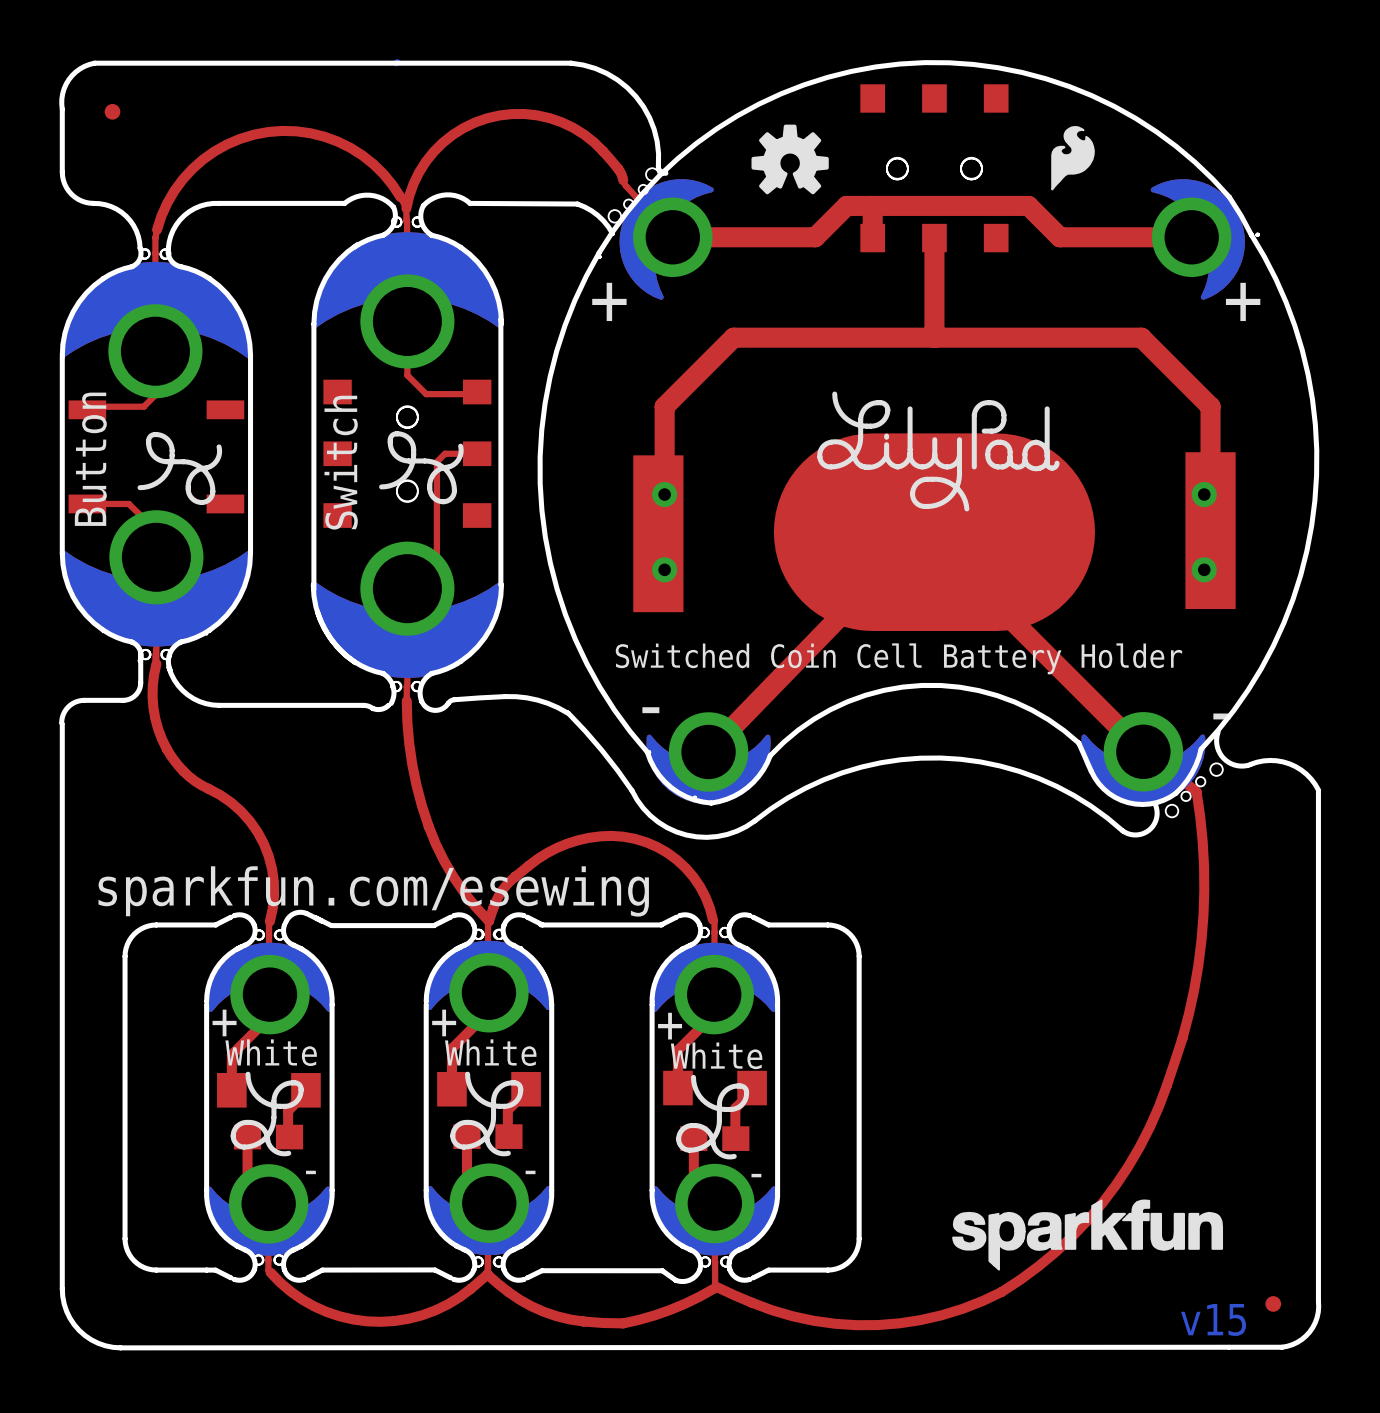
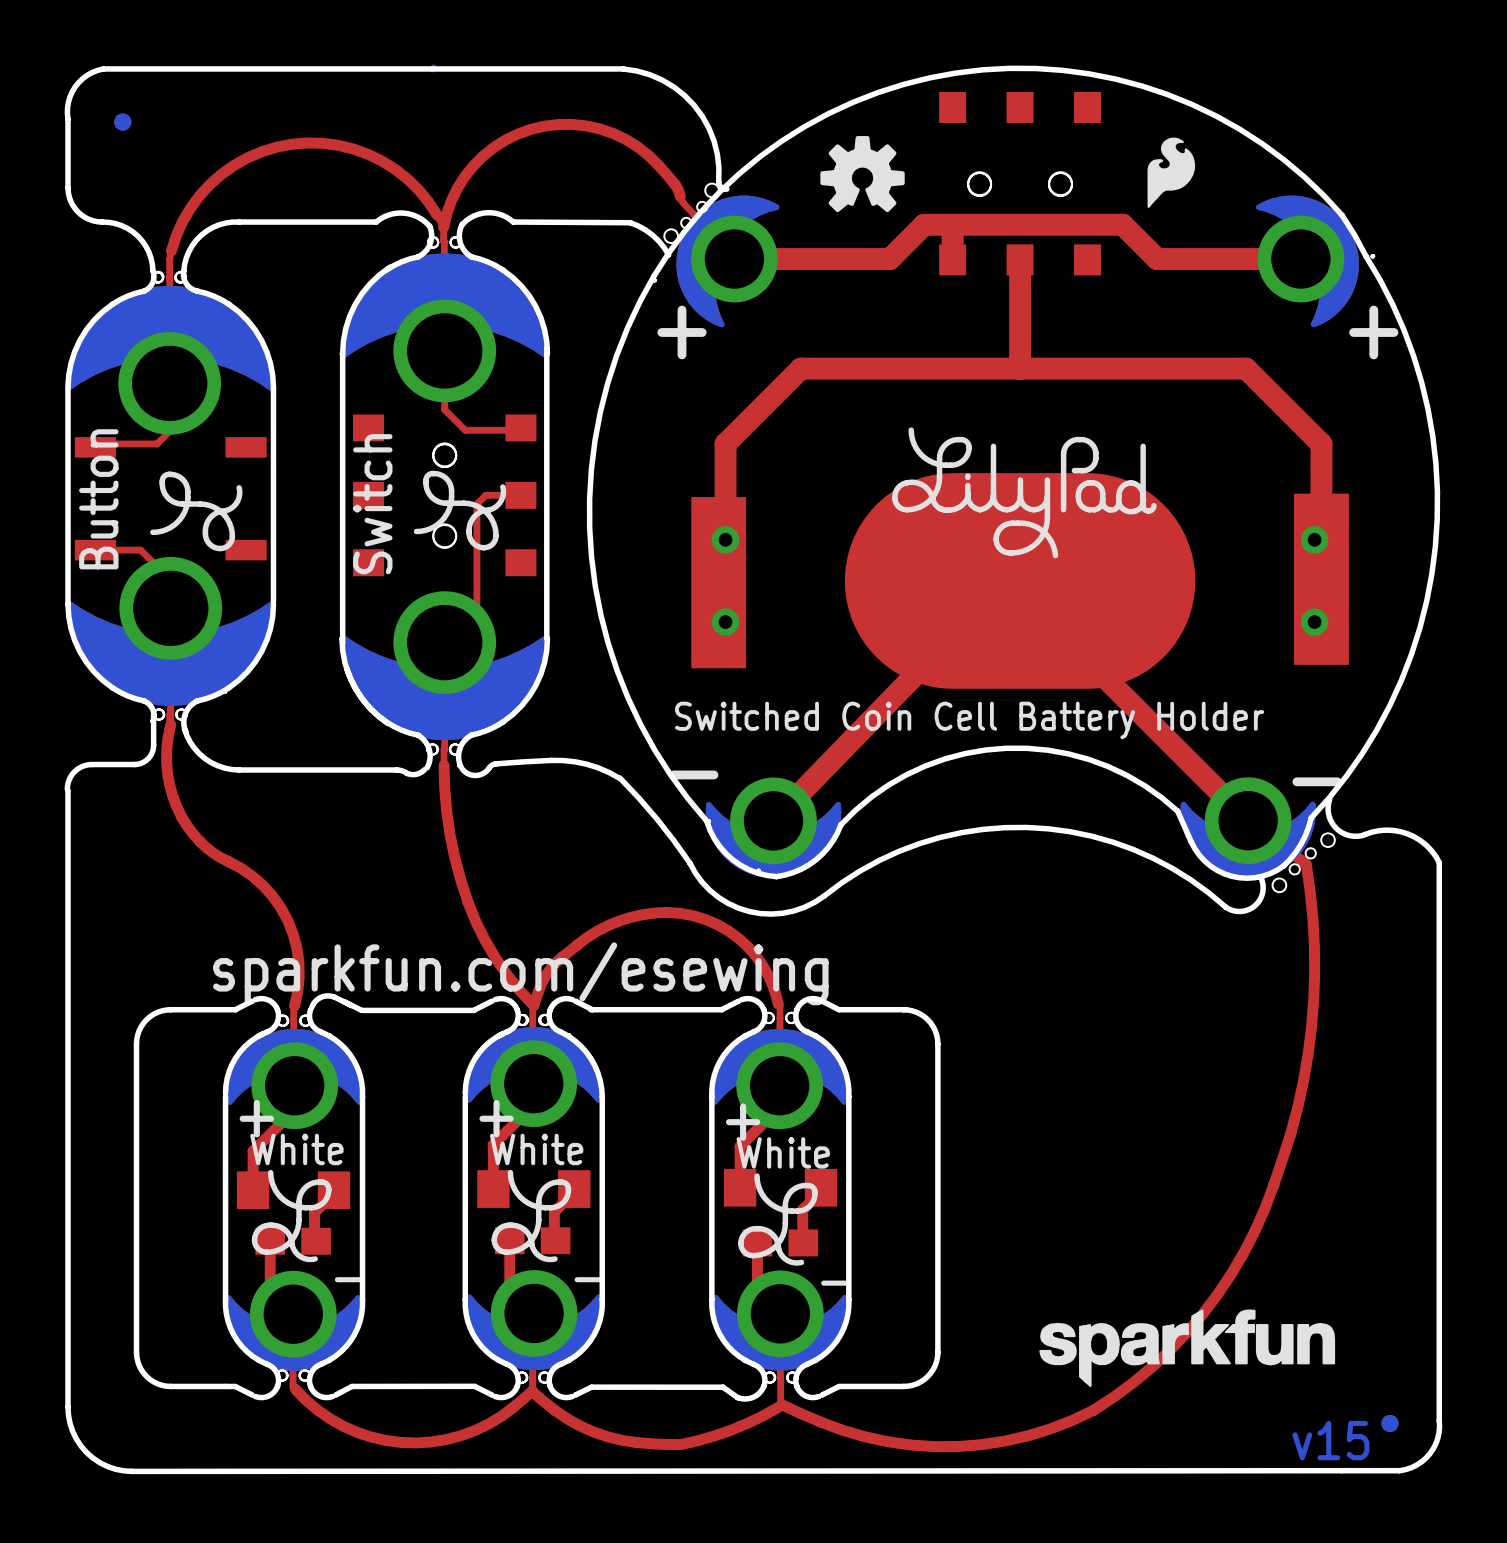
part: none -> (122, 122)
text position: sparkfun.com/esewing (373, 891) -> sparkfun.com/esewing (520, 973)
part: none -> (1389, 1423)

